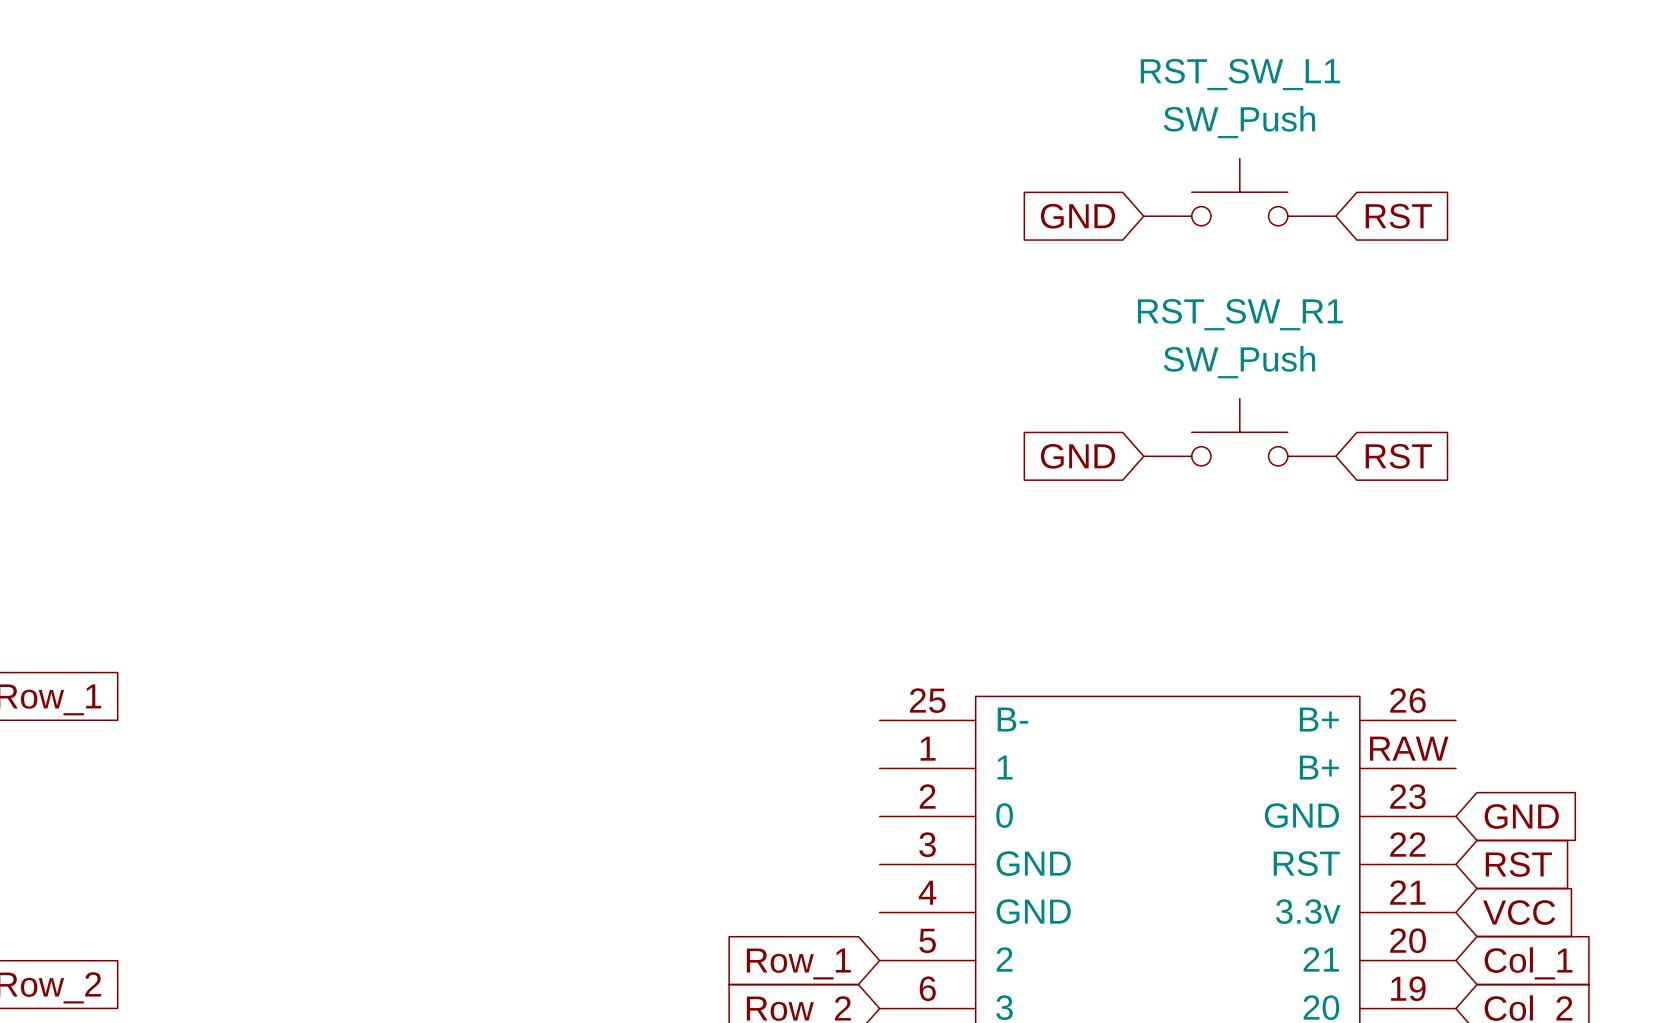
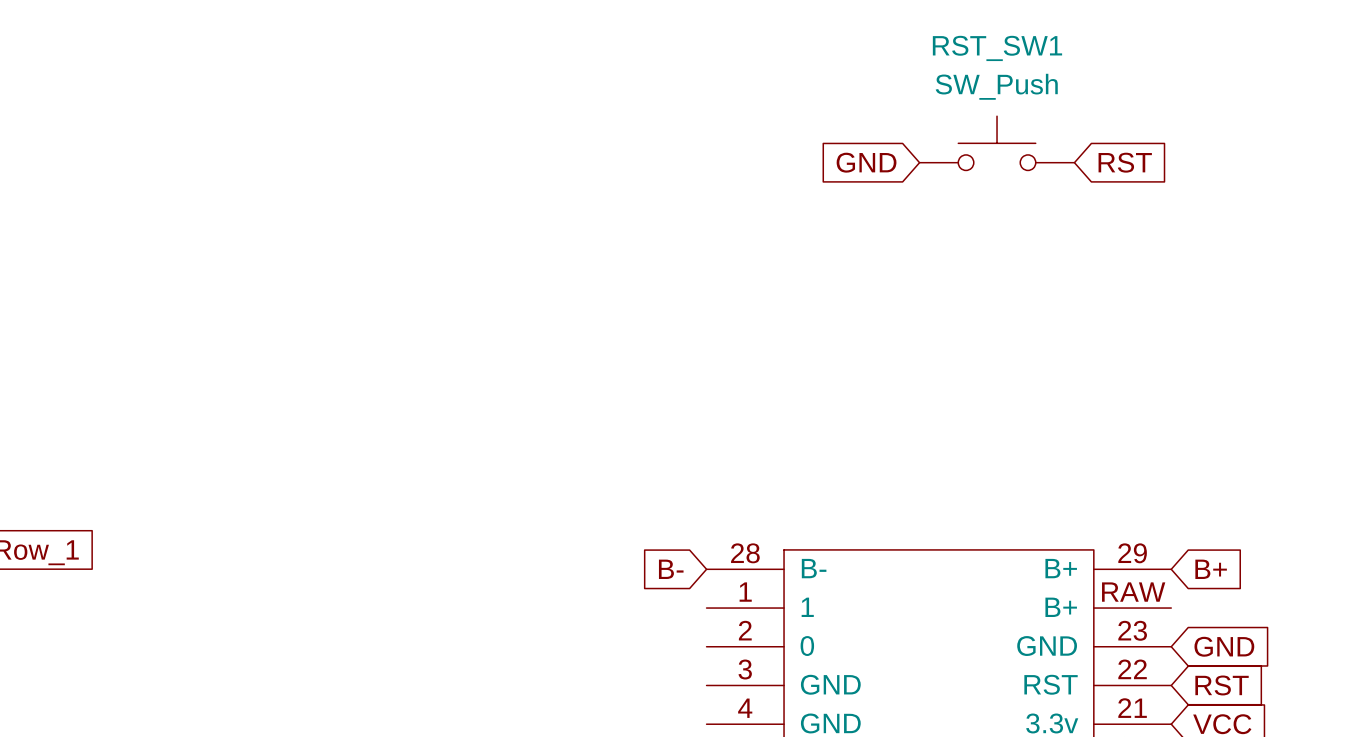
RST_SW_L1 name: RST_SW_L1 (1240, 74) -> RST_SW1 (997, 48)
RST_SW_R1: SW_Push (1239, 432) -> none
global label: GND (1077, 456) -> none
global label: RST (1398, 456) -> none
part pin number: 25 (927, 700) -> 28 (745, 553)
part pin number: 26 (1407, 700) -> 29 (1132, 553)
global label: none -> B- (671, 569)
global label: none -> B+ (1211, 569)

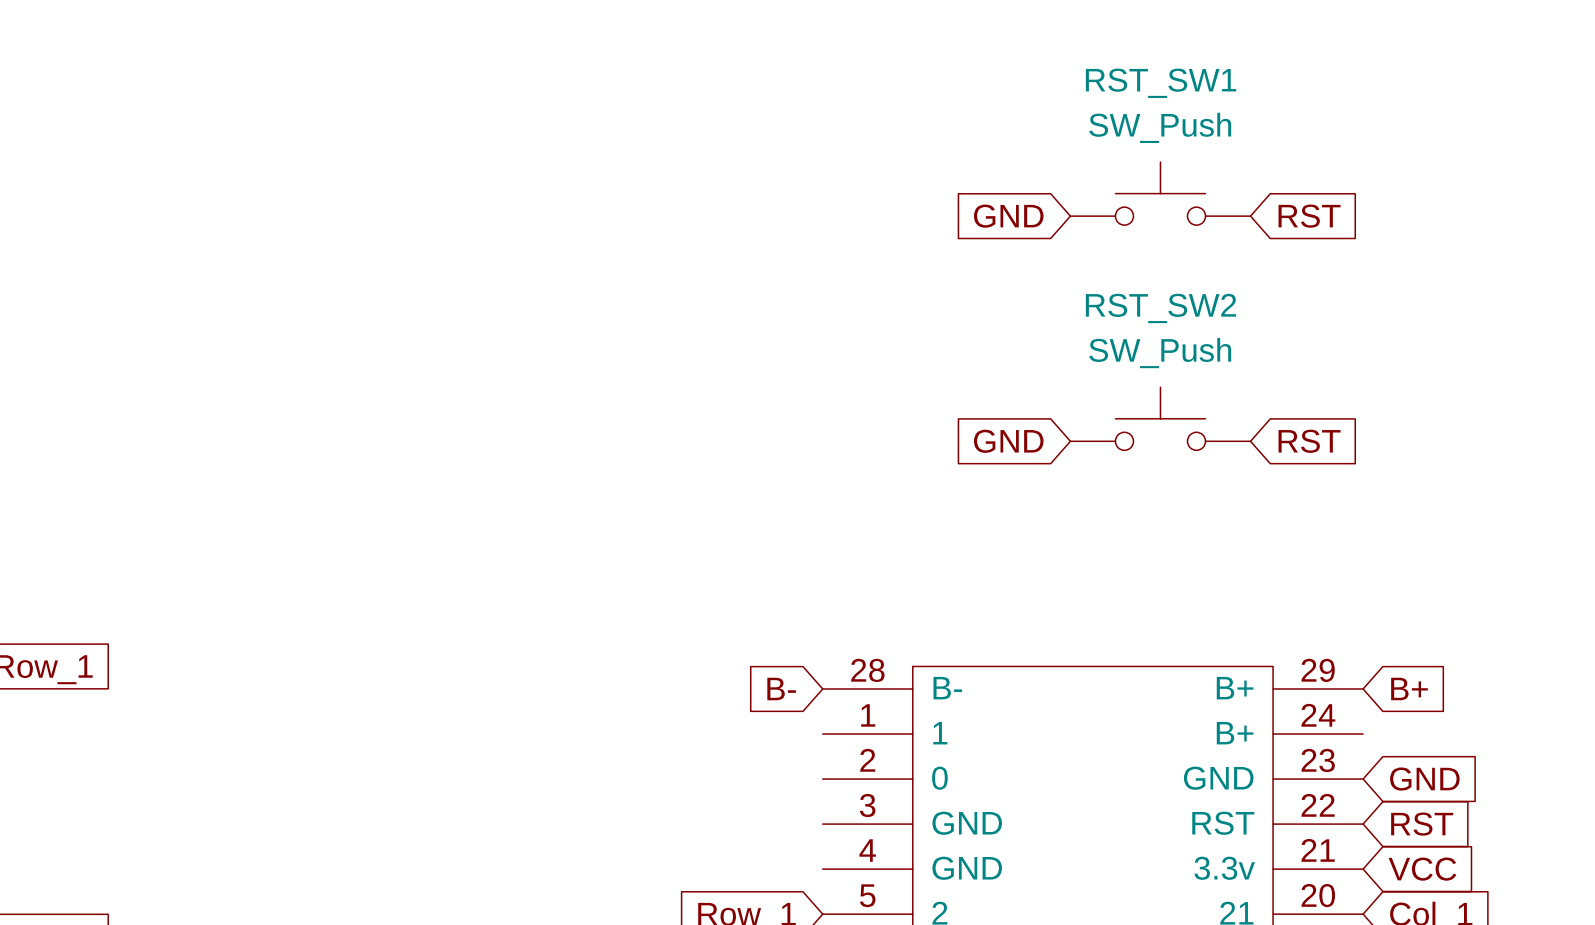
RST_SW2: none -> SW_Push (1160, 418)
global label: none -> GND (1008, 441)
global label: none -> RST (1309, 441)
part pin number: RAW (1133, 592) -> 24 (1318, 715)

